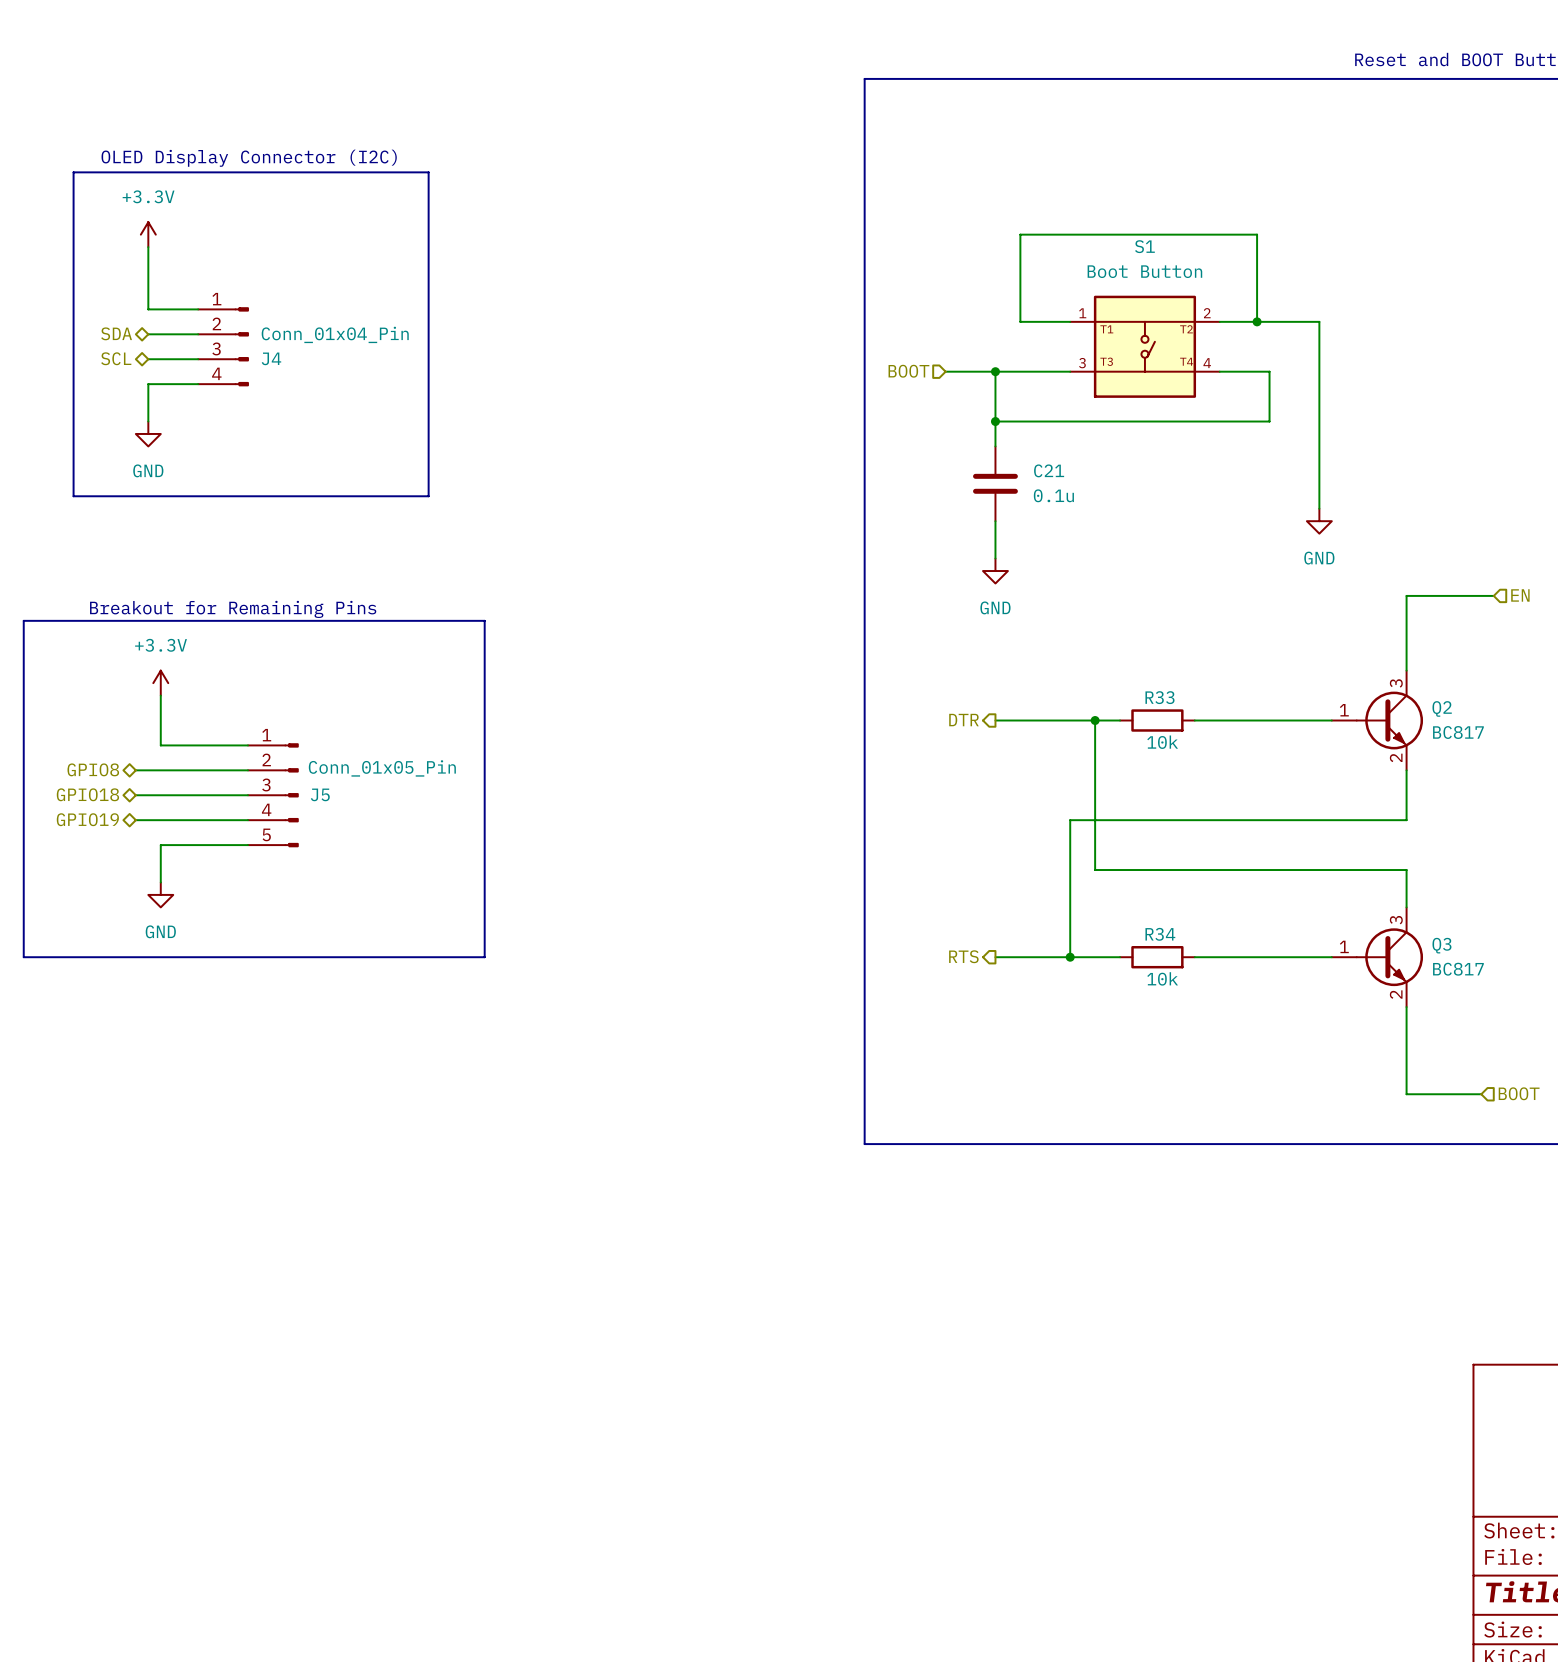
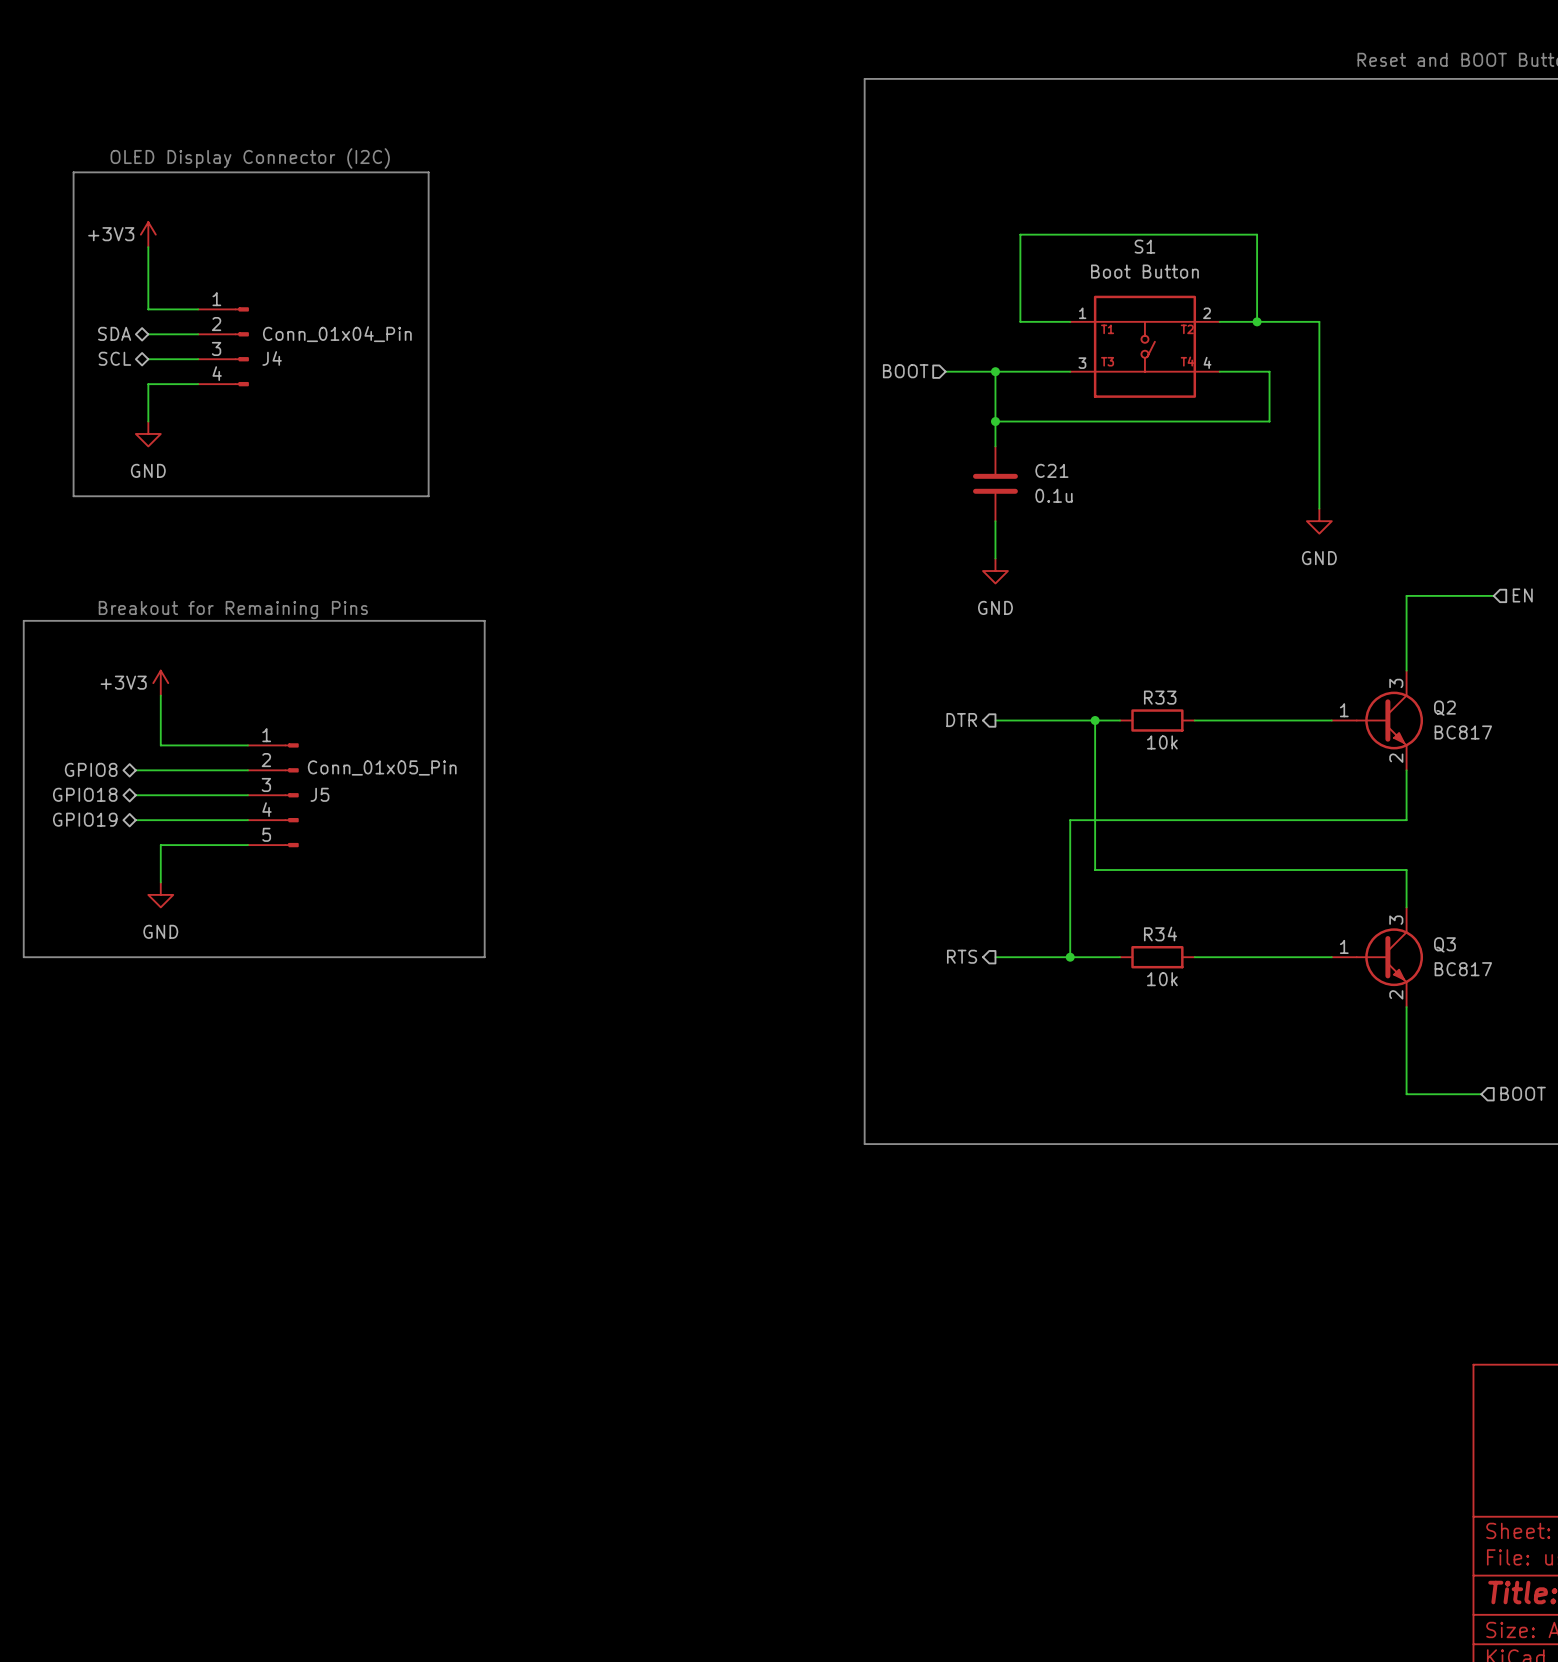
power symbol: +3.3V (148, 234) -> +3V3 (148, 234)
power symbol: +3.3V (160, 683) -> +3V3 (160, 683)

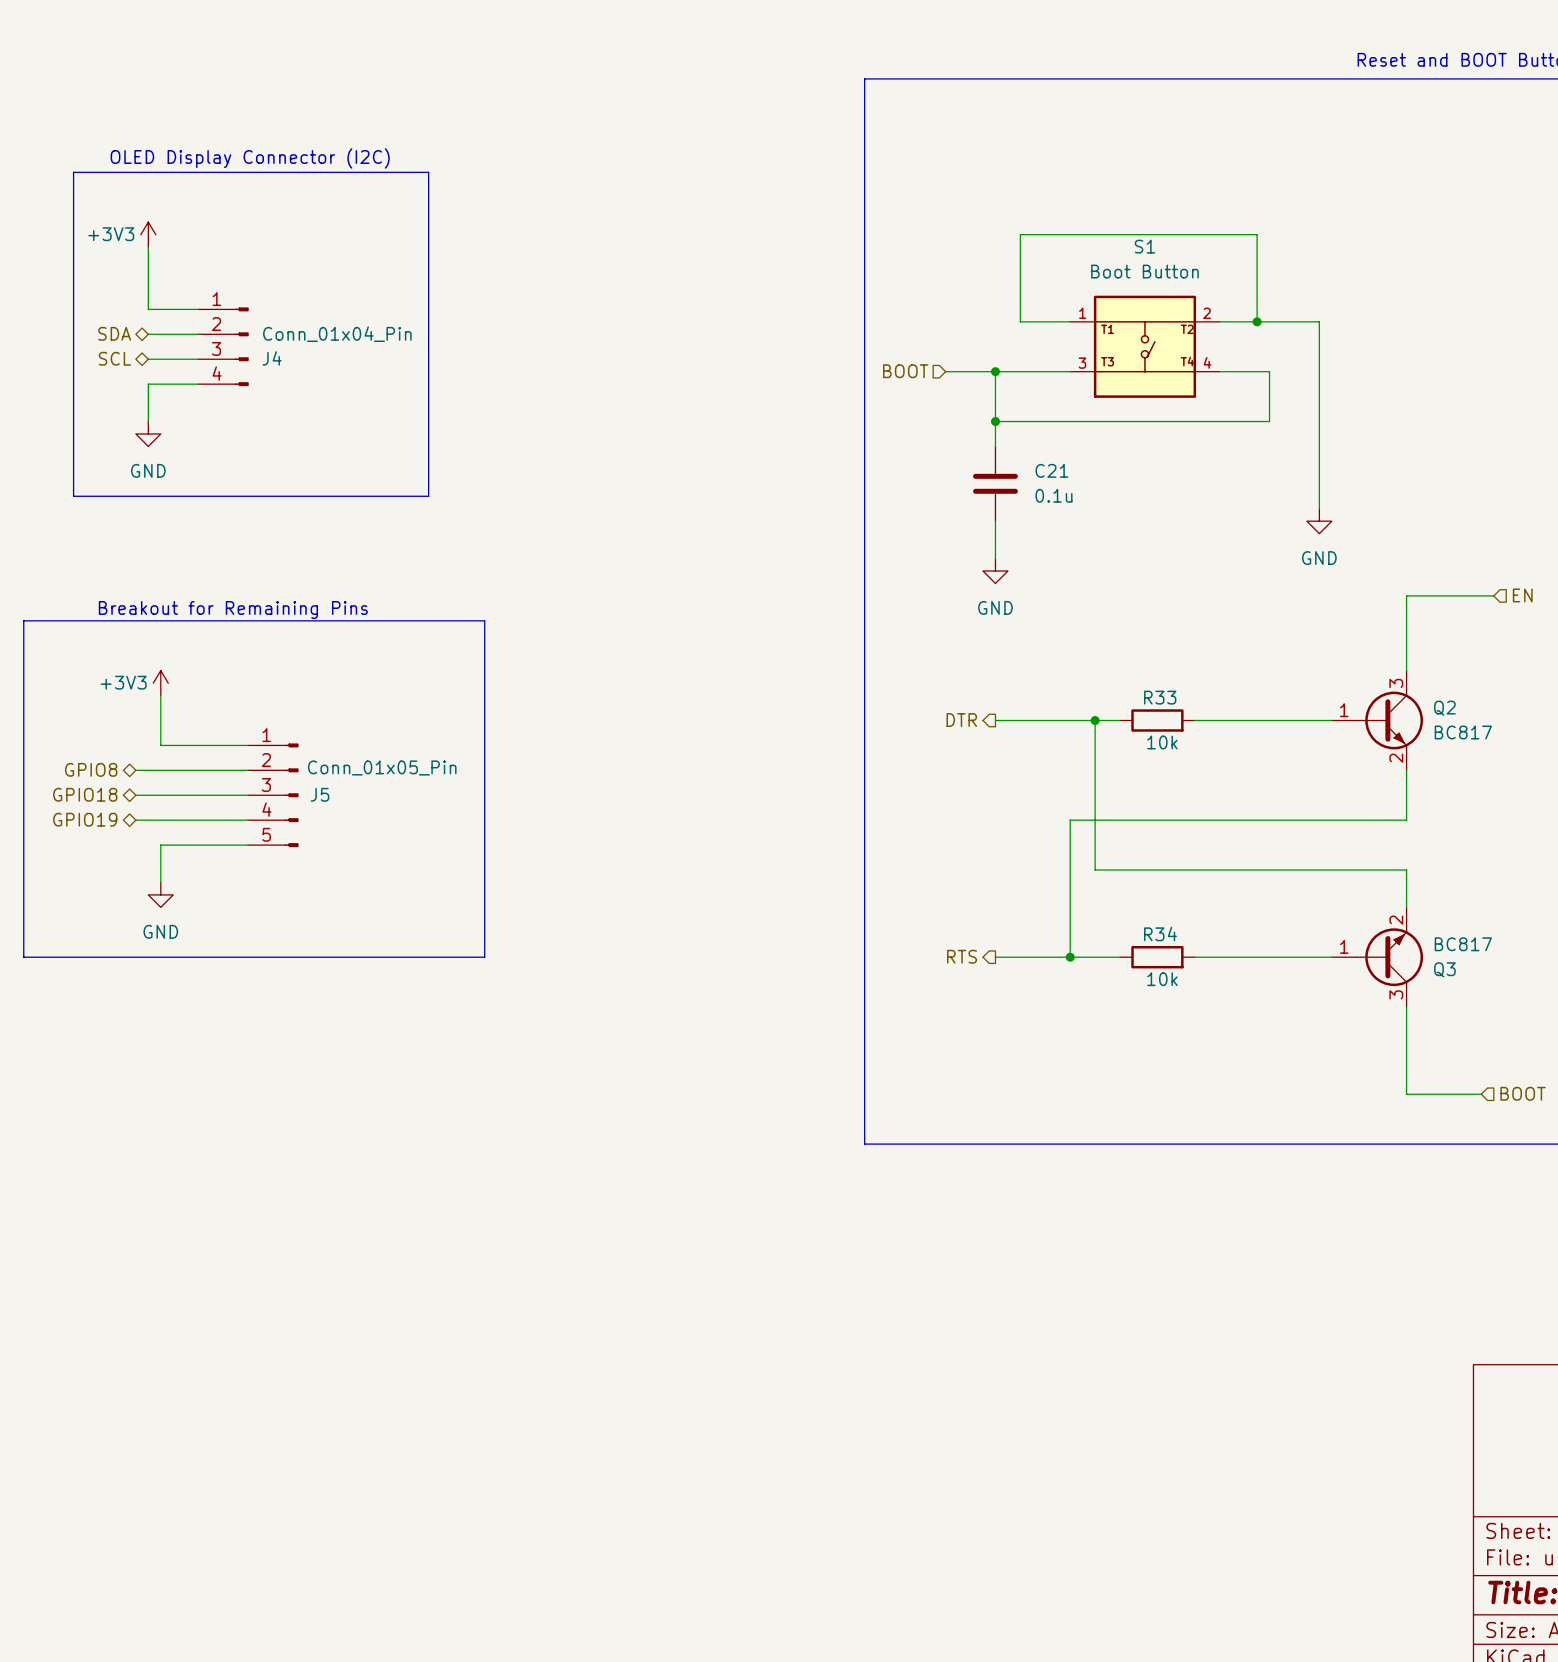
Q3 flip: as is (1389, 957) -> up-down (1389, 957)

